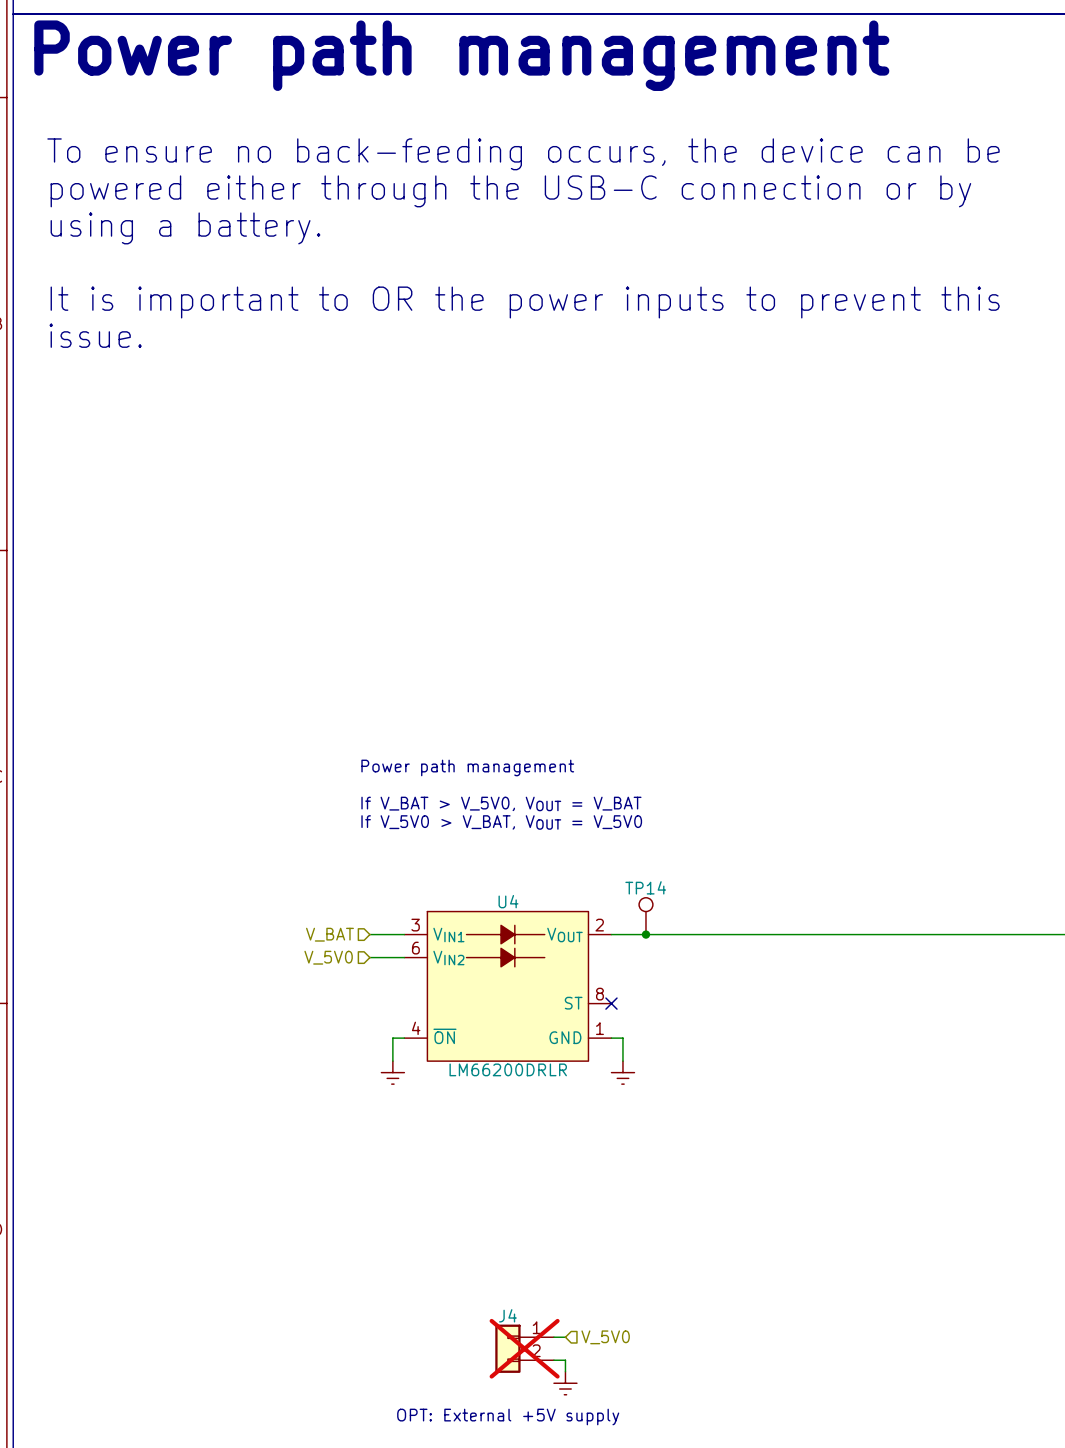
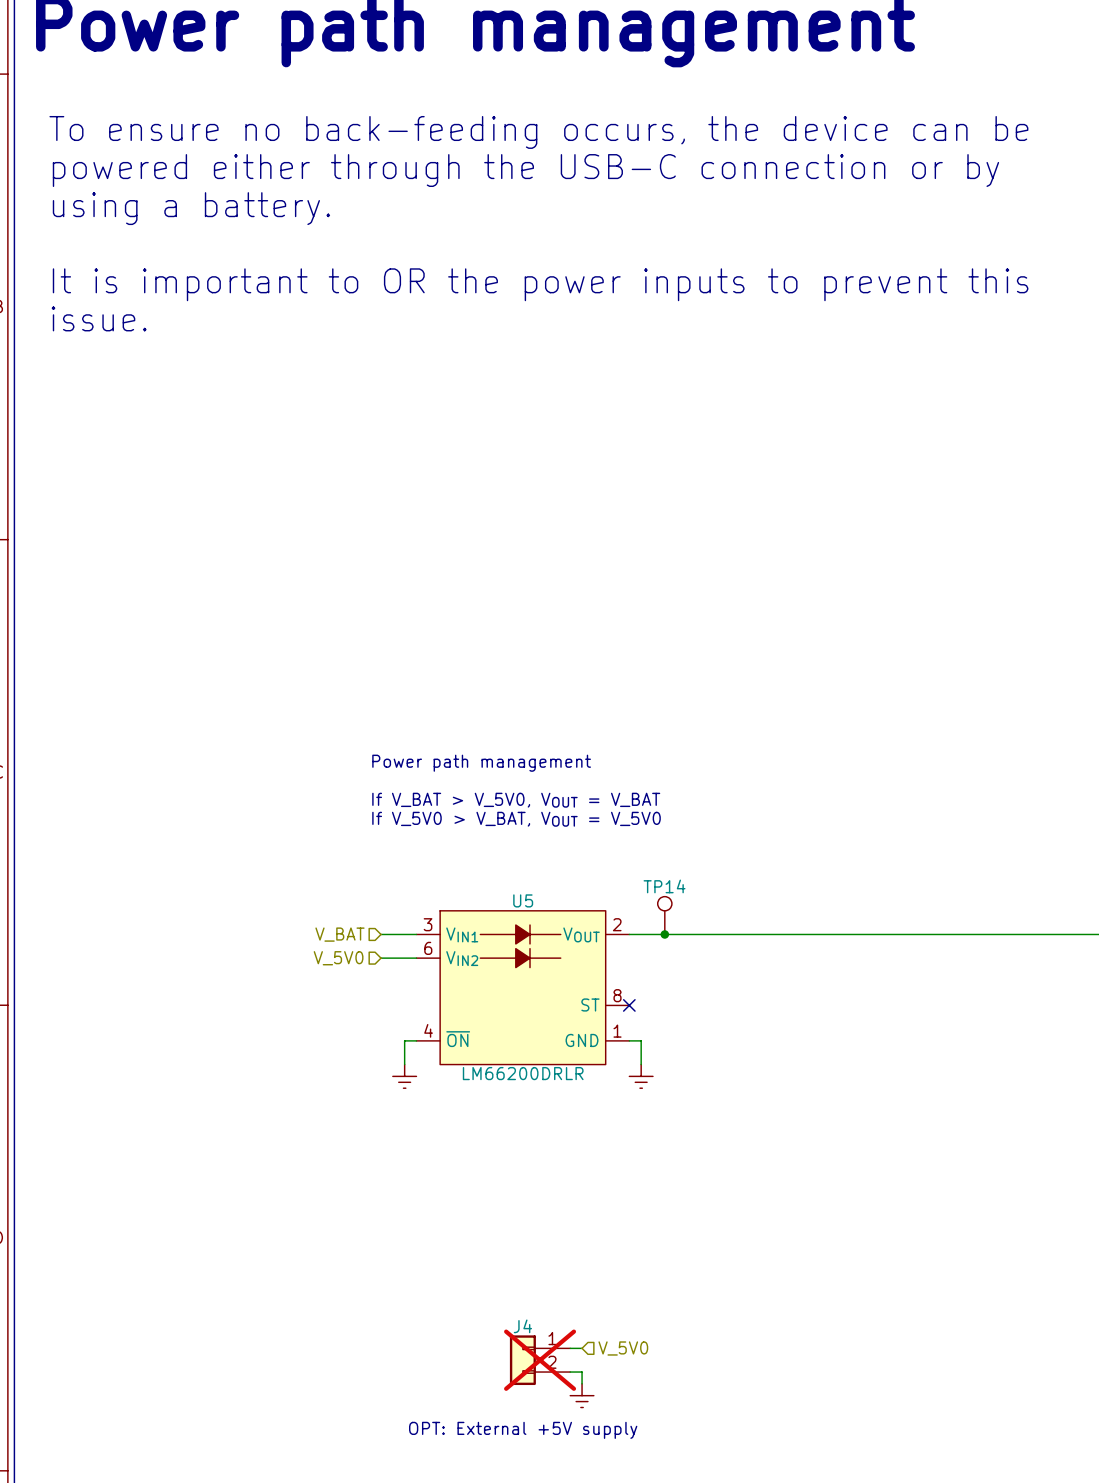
U4 name: U4 (508, 901) -> U5 (523, 900)

